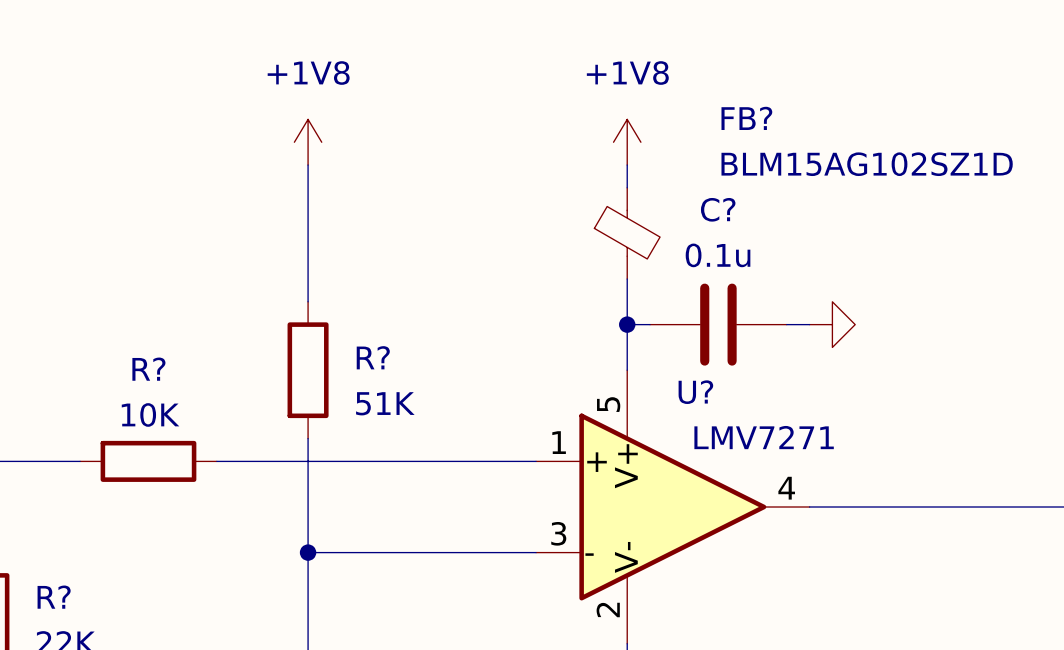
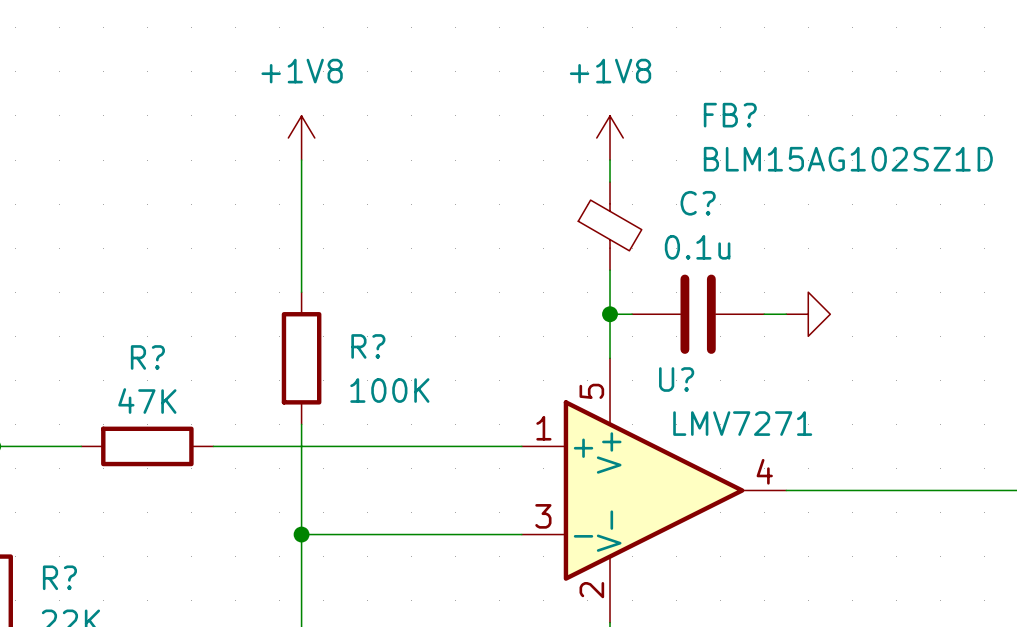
R? value: 51K (385, 403) -> 100K (389, 390)
R? value: 10K (150, 414) -> 47K (147, 401)

